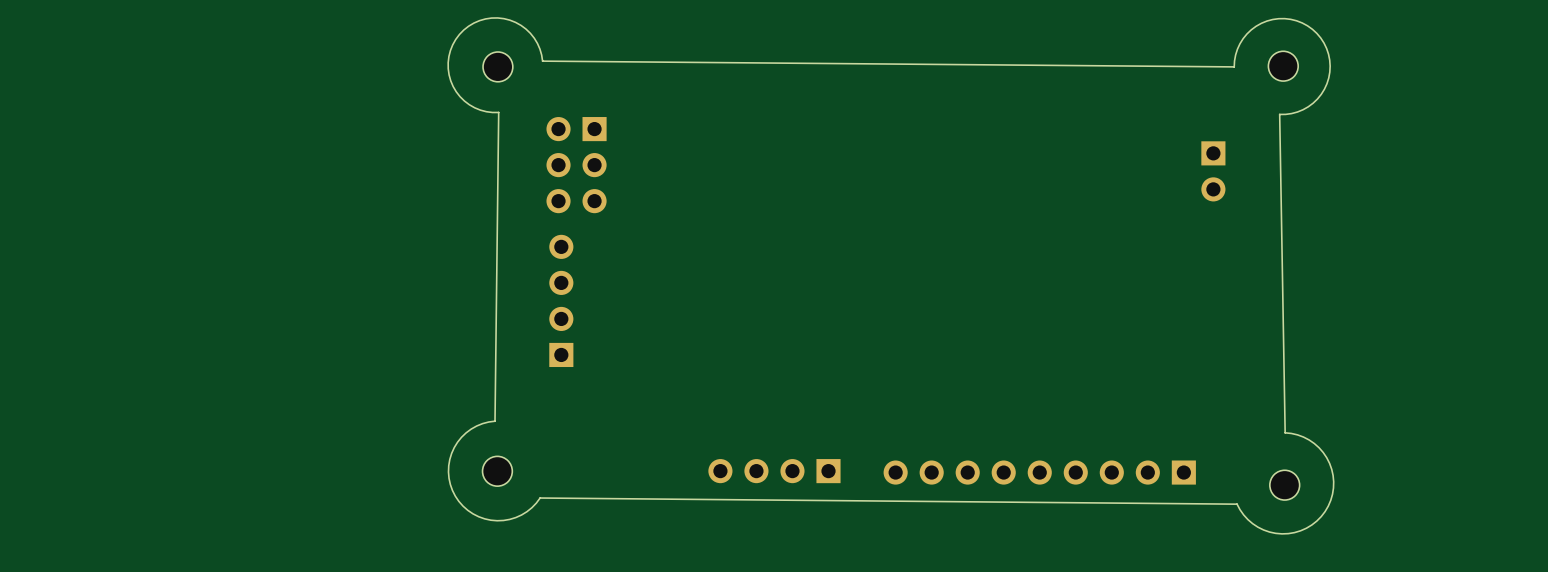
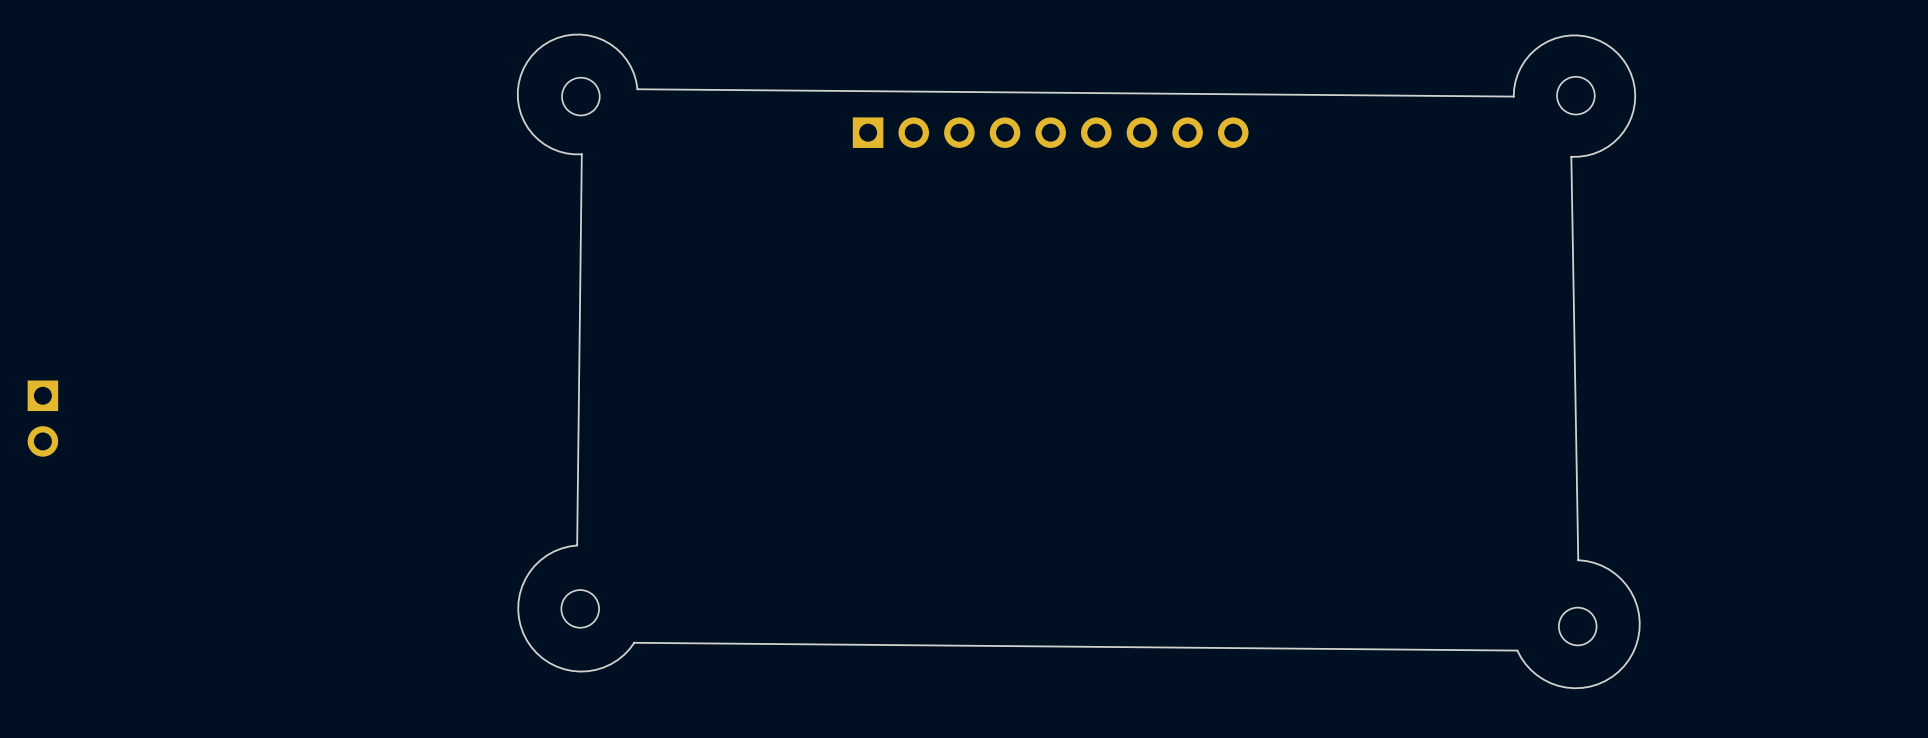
part: none -> (1050, 132)
part: (576, 165) -> none
part: (1213, 171) -> none
part: (561, 300) -> none
part: none -> (42, 418)
part: (774, 471) -> none
part: (1039, 472) -> none

